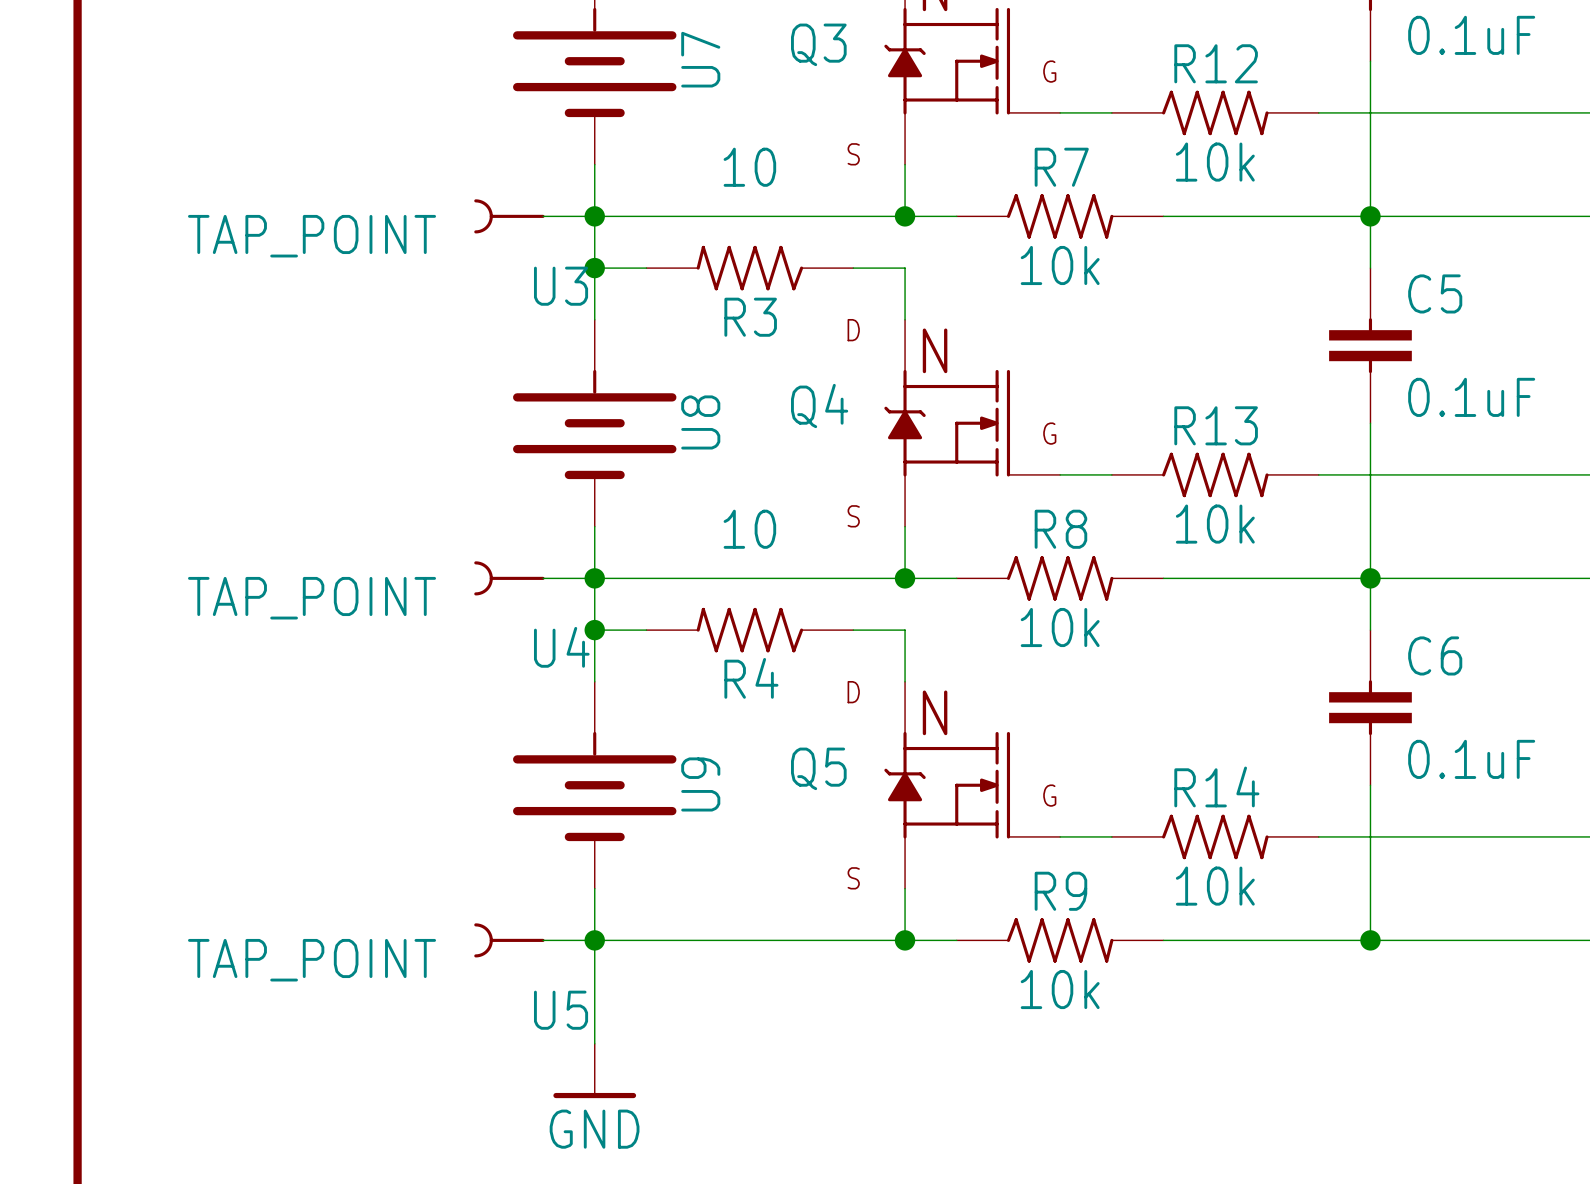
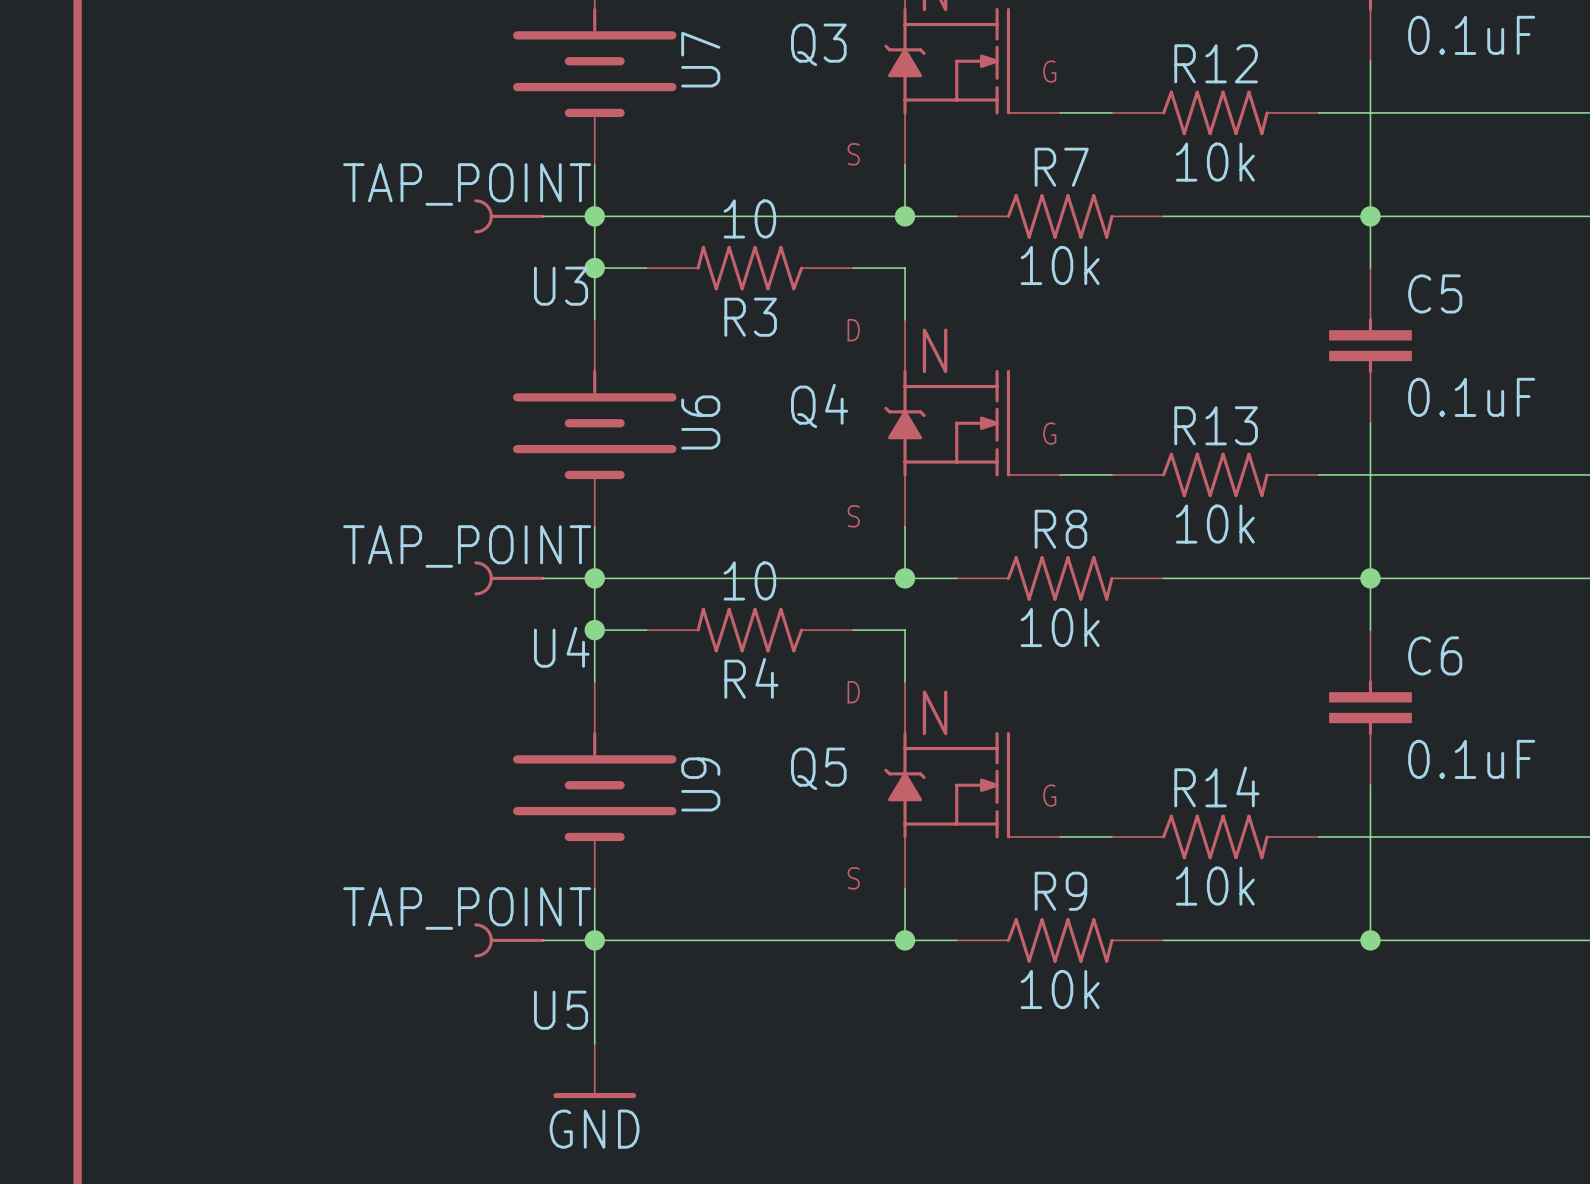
R3 value position: 10 (749, 167) -> 10 (749, 218)
U3 value position: TAP_POINT (312, 236) -> TAP_POINT (467, 184)
U8 name: U8 (700, 422) -> U6 (700, 422)
R4 value position: 10 (749, 529) -> 10 (749, 580)
U4 value position: TAP_POINT (312, 598) -> TAP_POINT (467, 546)
U5 value position: TAP_POINT (312, 960) -> TAP_POINT (467, 908)

